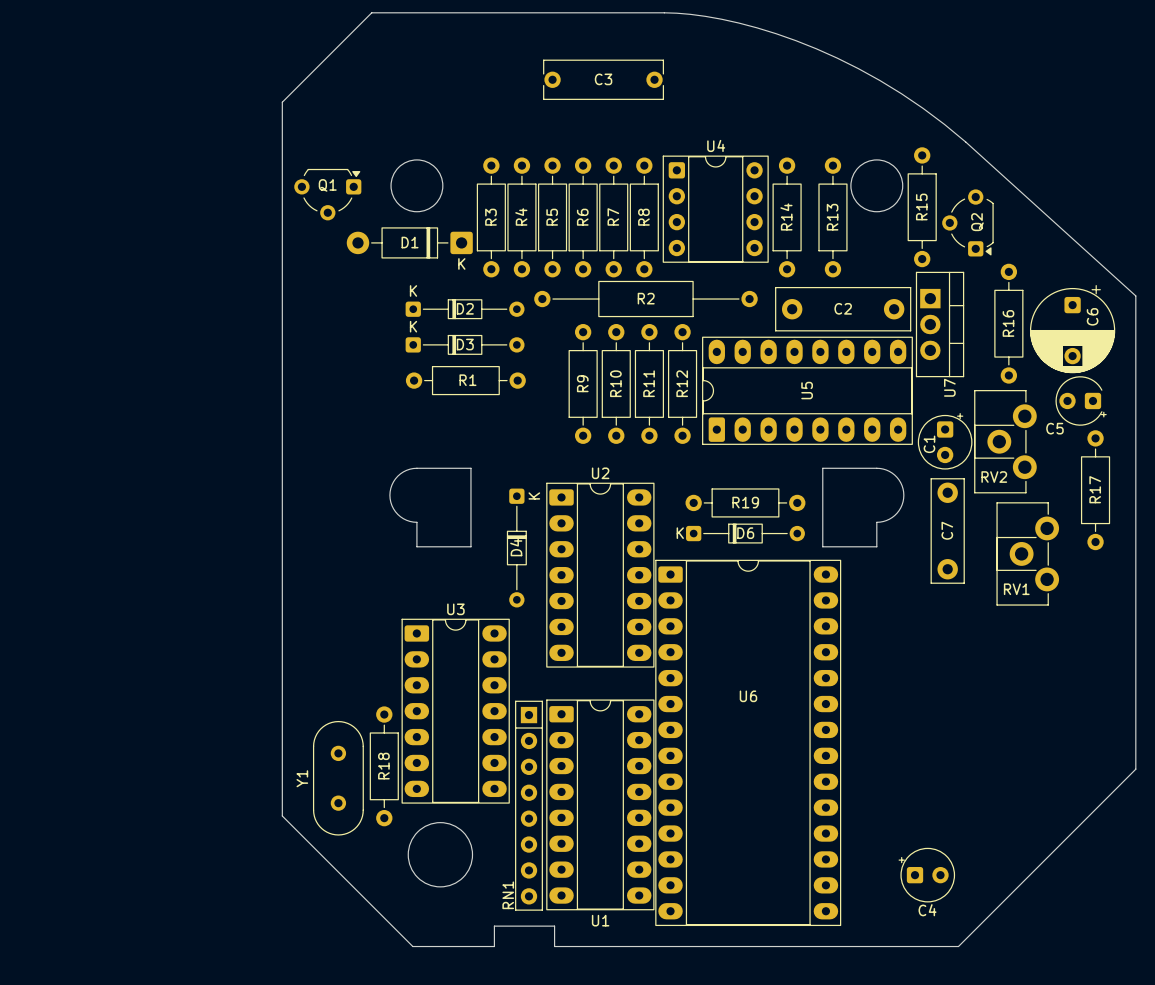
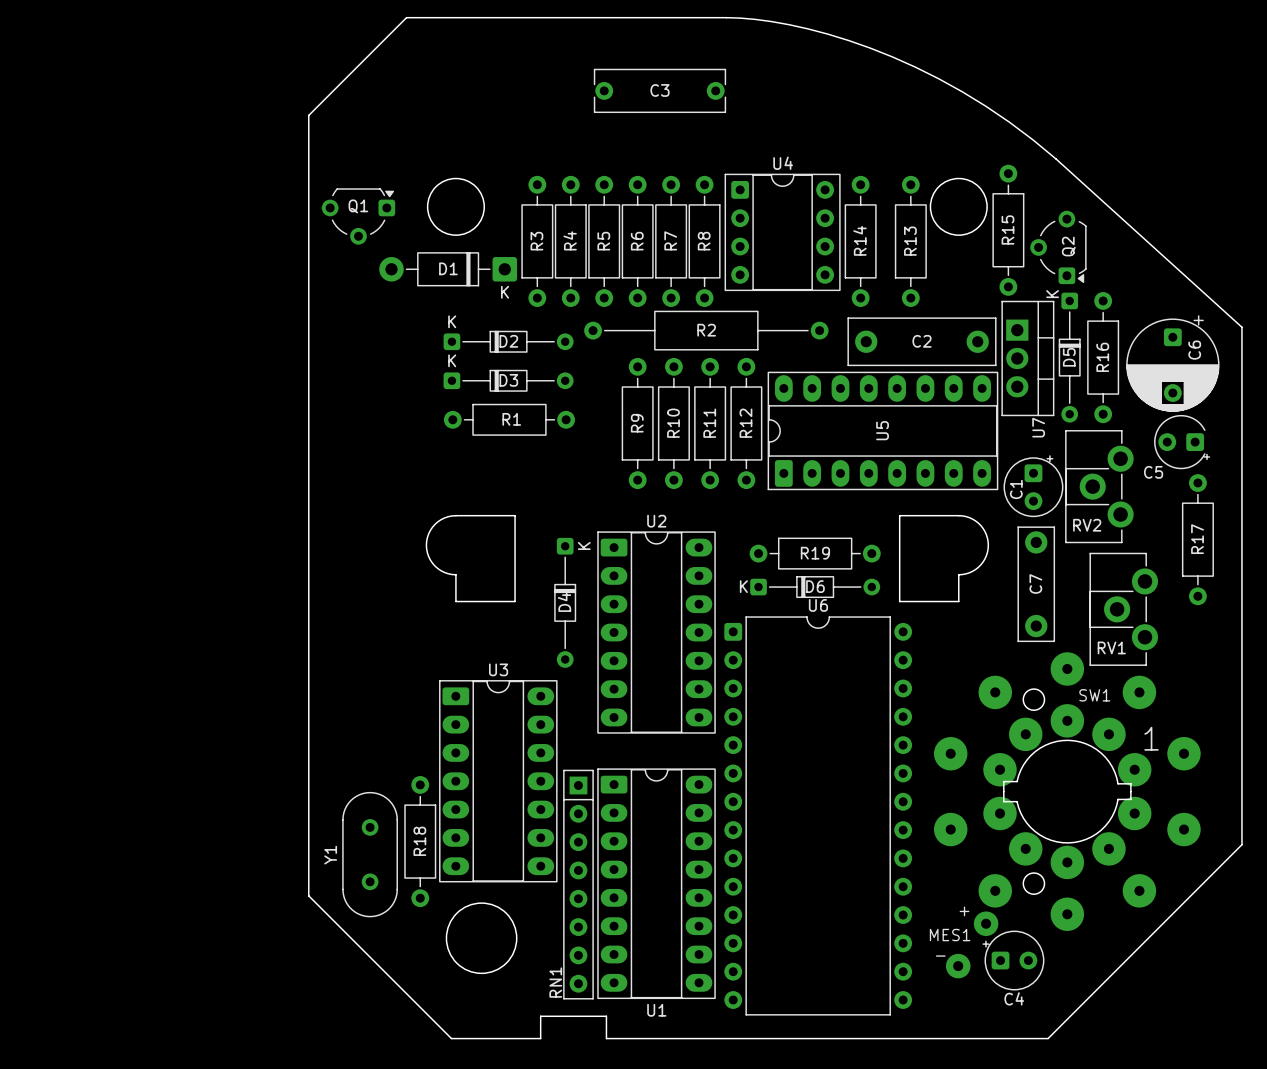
D5: none -> (1069, 357)
U6 footprint: [655, 559, 842, 927] -> [724, 616, 913, 1016]
U6 name position: U6 (748, 696) -> U6 (818, 605)
SW1: none -> (1067, 791)
MES1: none -> (972, 944)

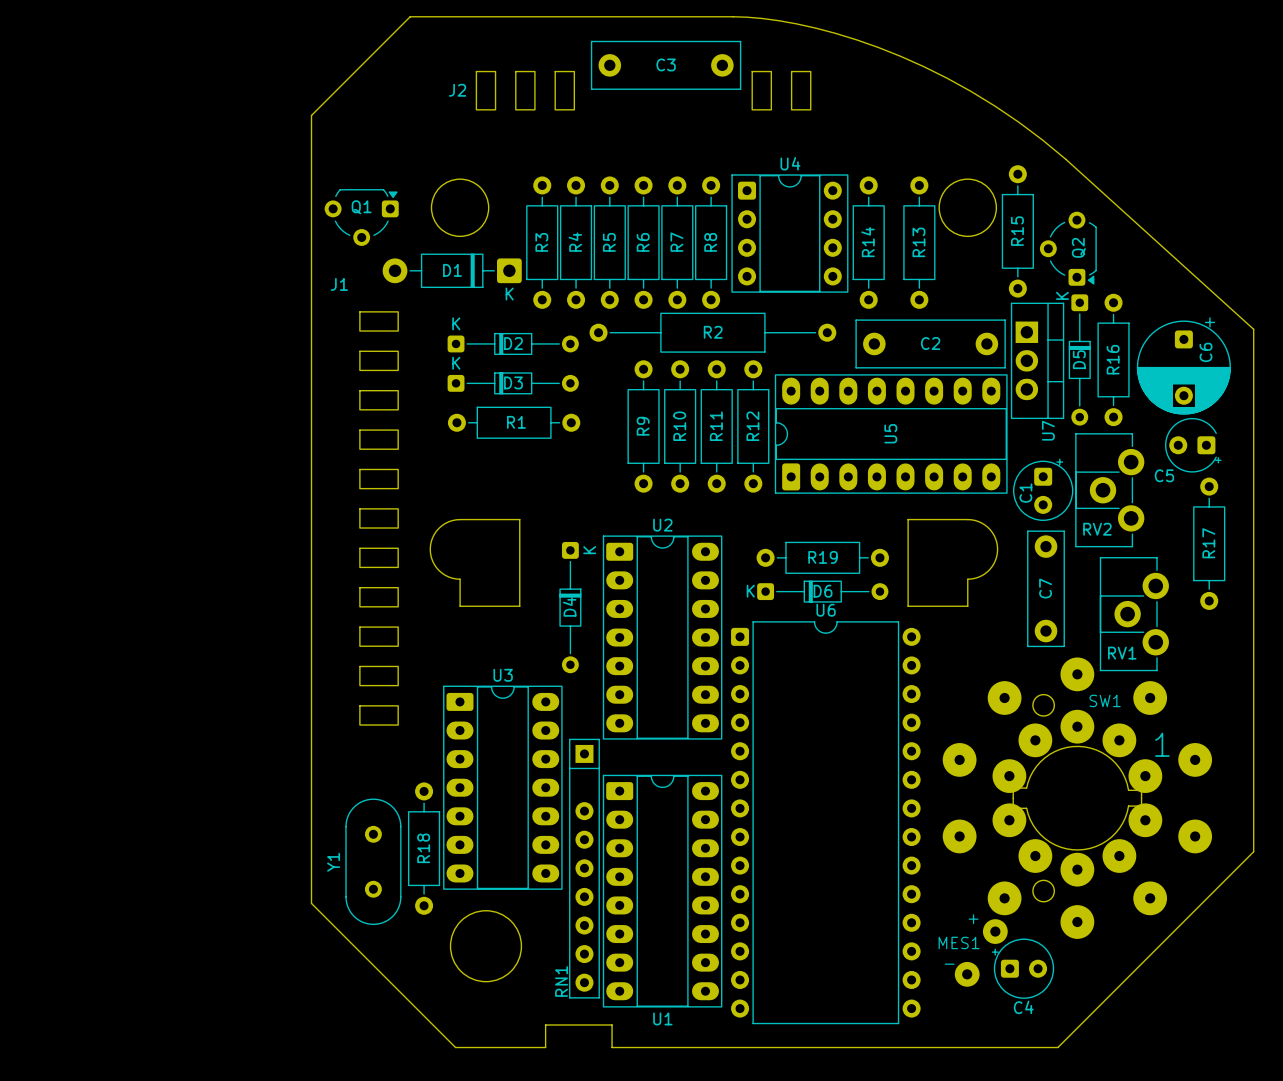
C3 footprint: [593, 68, 727, 113] -> [590, 40, 742, 90]
J2: none -> (643, 90)
J1: none -> (379, 518)
RN1 footprint: [563, 769, 594, 1000] -> [569, 738, 600, 999]

